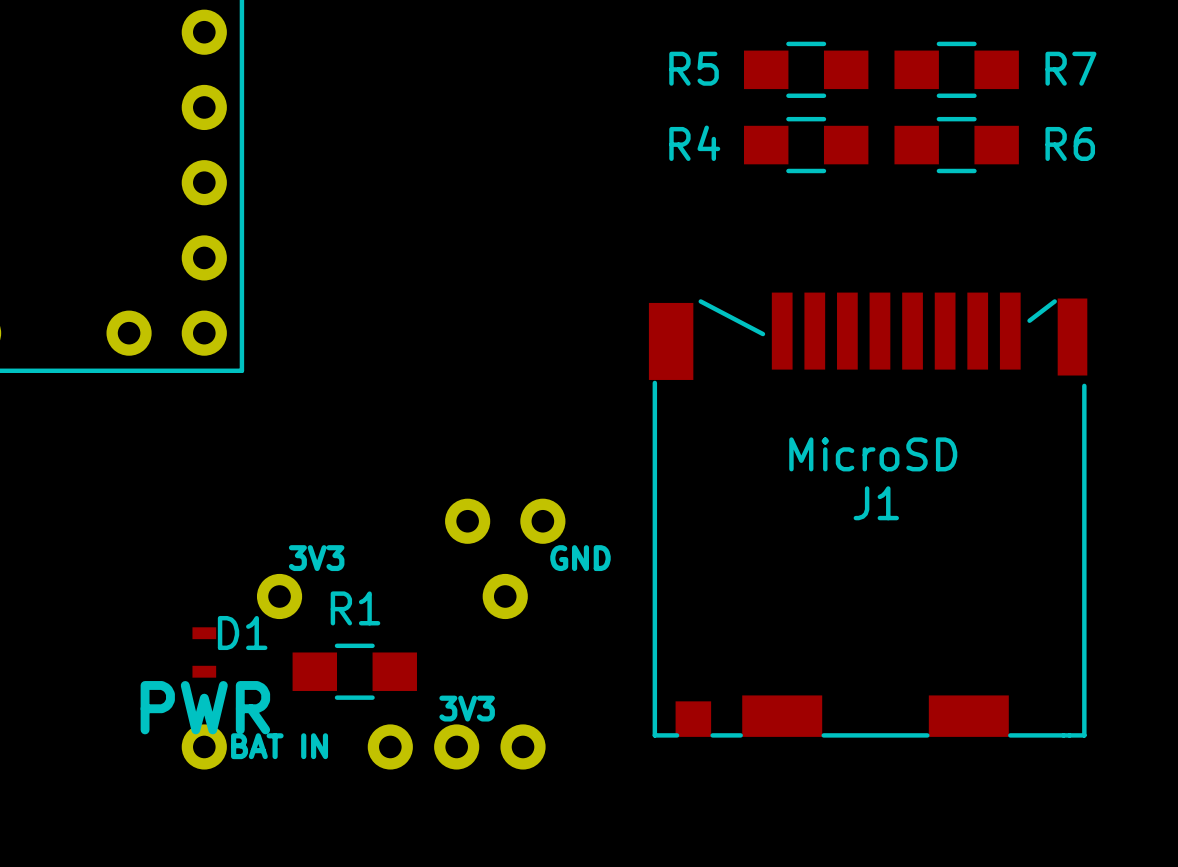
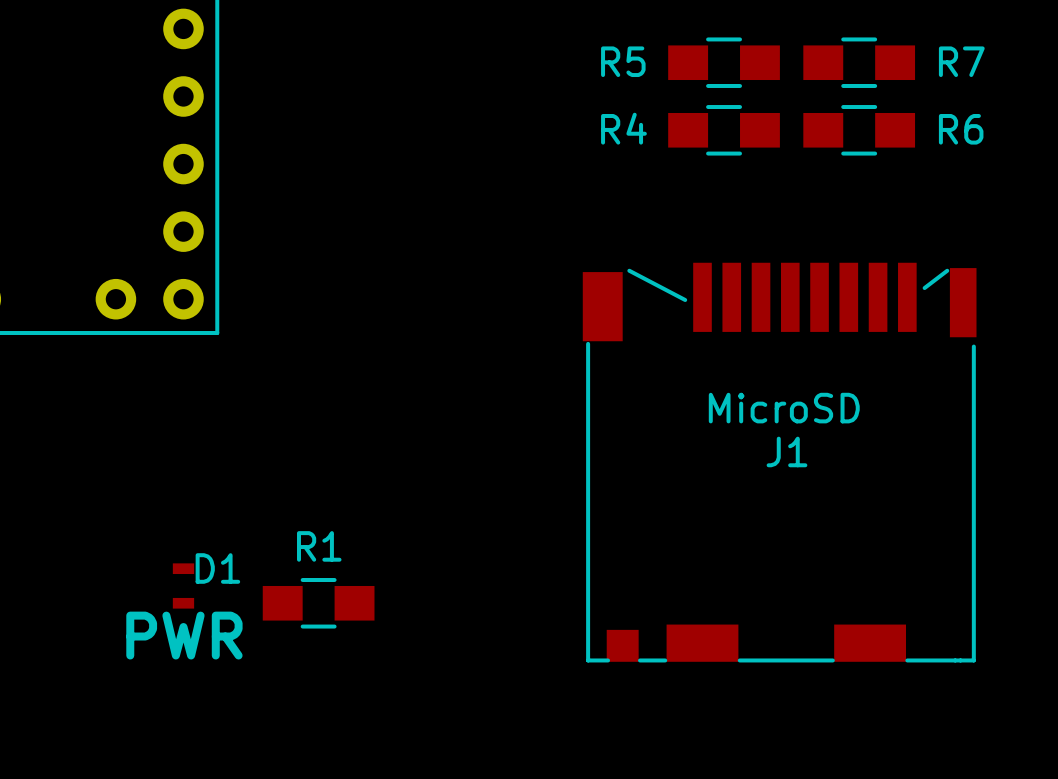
part: (467, 521) -> none
part: (542, 521) -> none
text: 3V3 (316, 558) -> none
text: GND (580, 558) -> none
part: (279, 596) -> none
part: (505, 596) -> none
text: 3V3 (467, 708) -> none
part: (204, 746) -> none
text: BAT IN (279, 746) -> none
part: (390, 746) -> none
part: (456, 746) -> none
part: (523, 746) -> none

